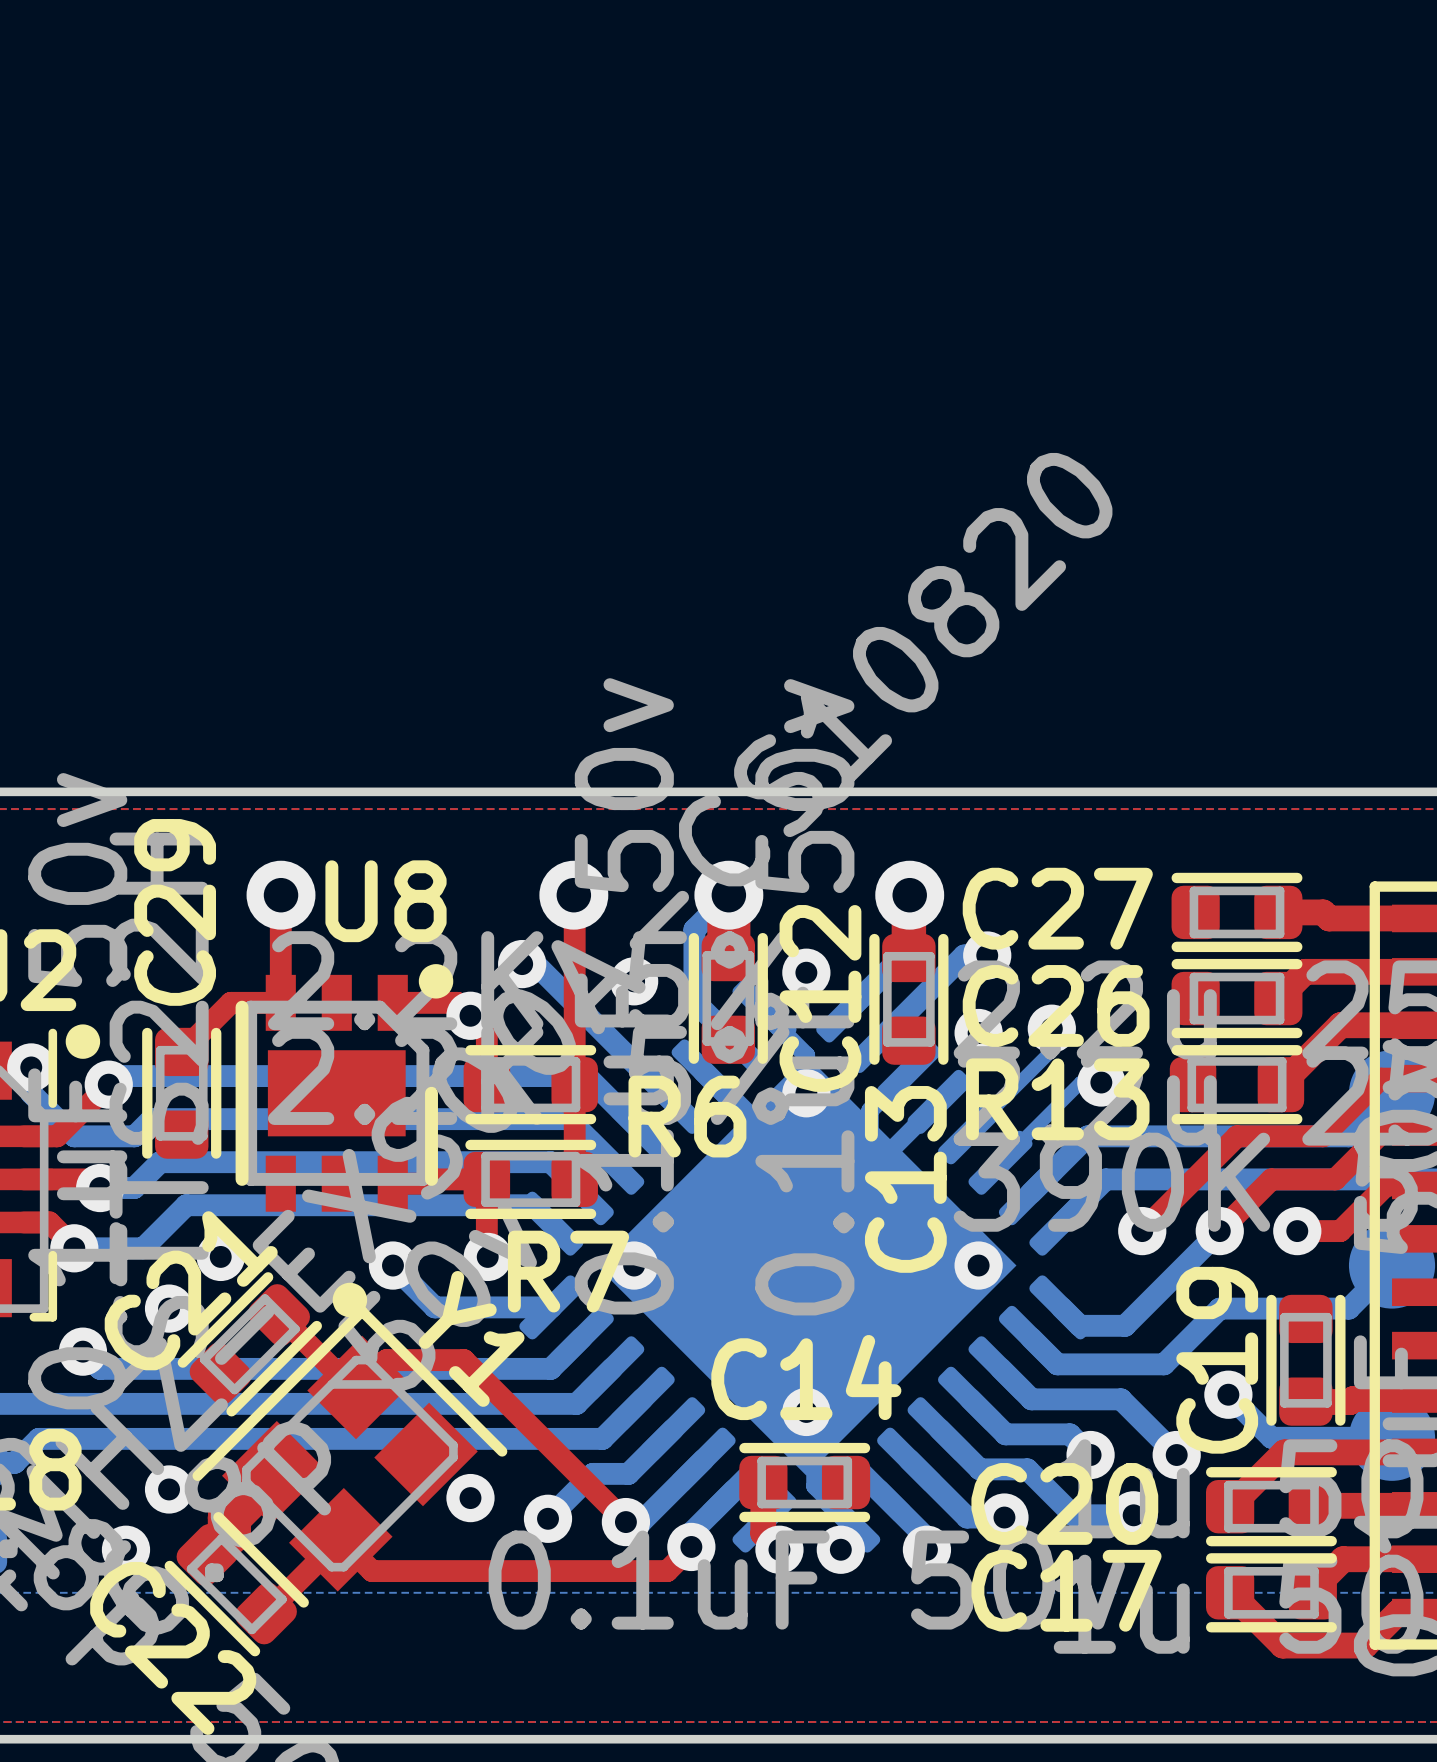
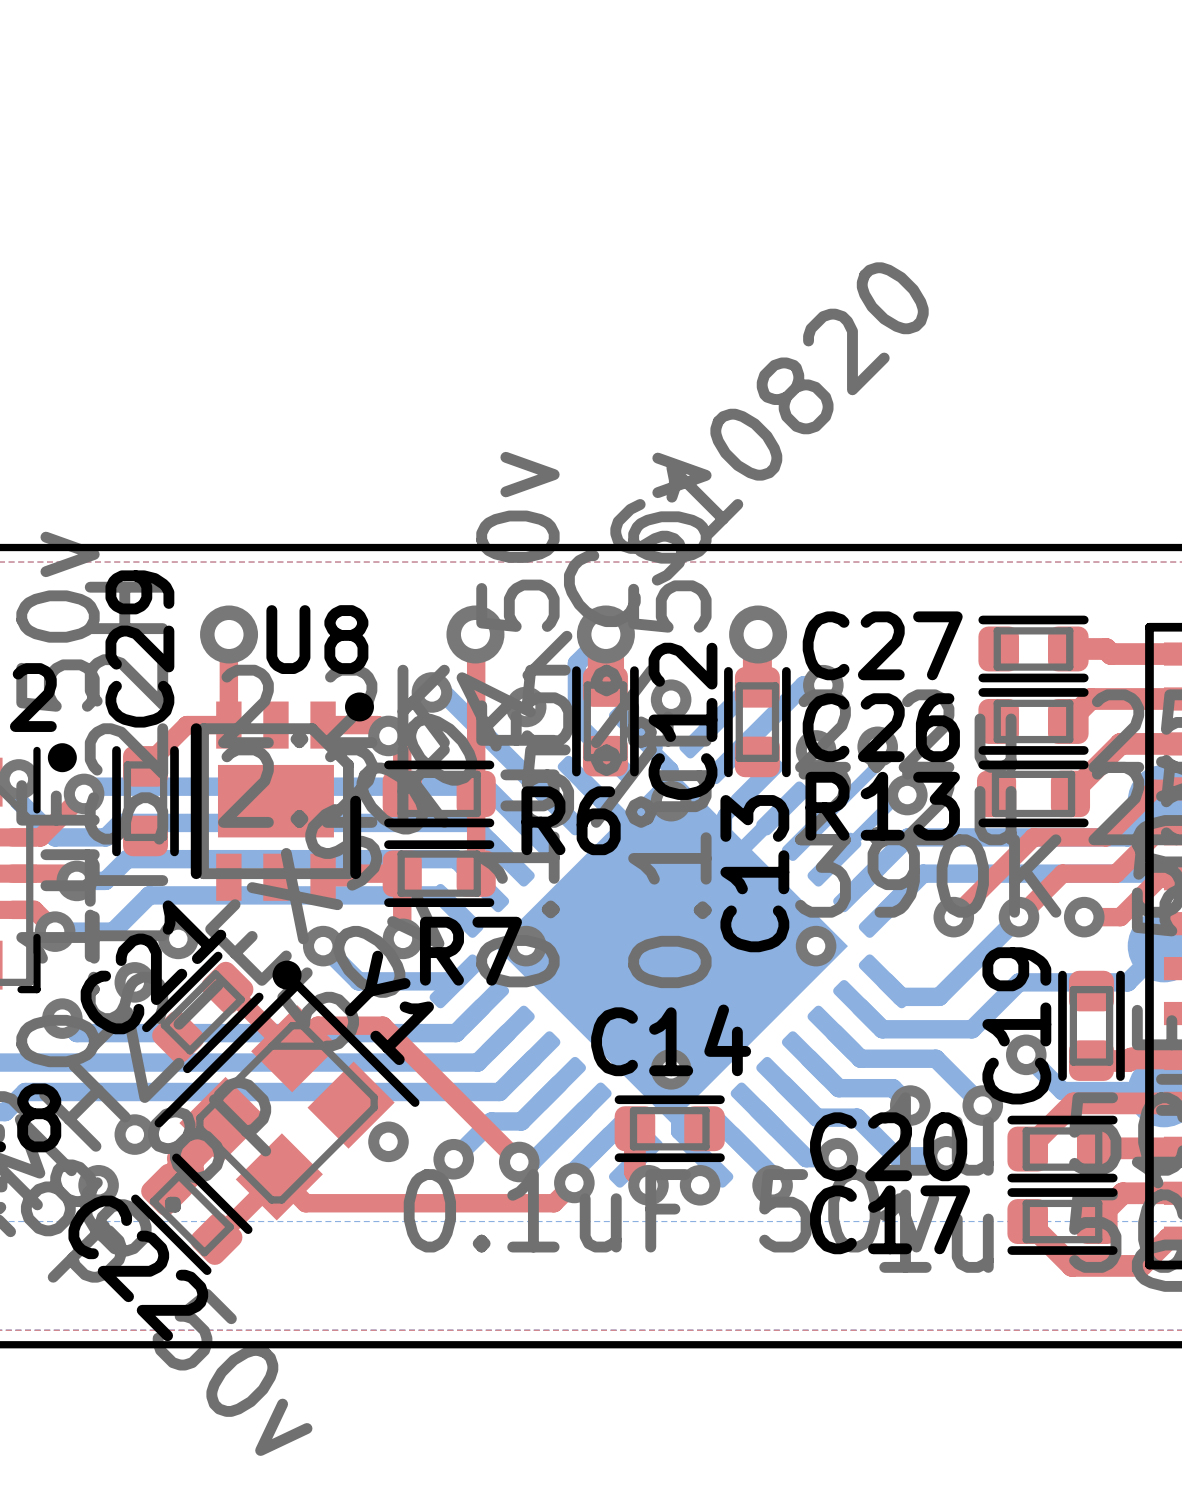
via position: (1101, 1082) -> (907, 795)

